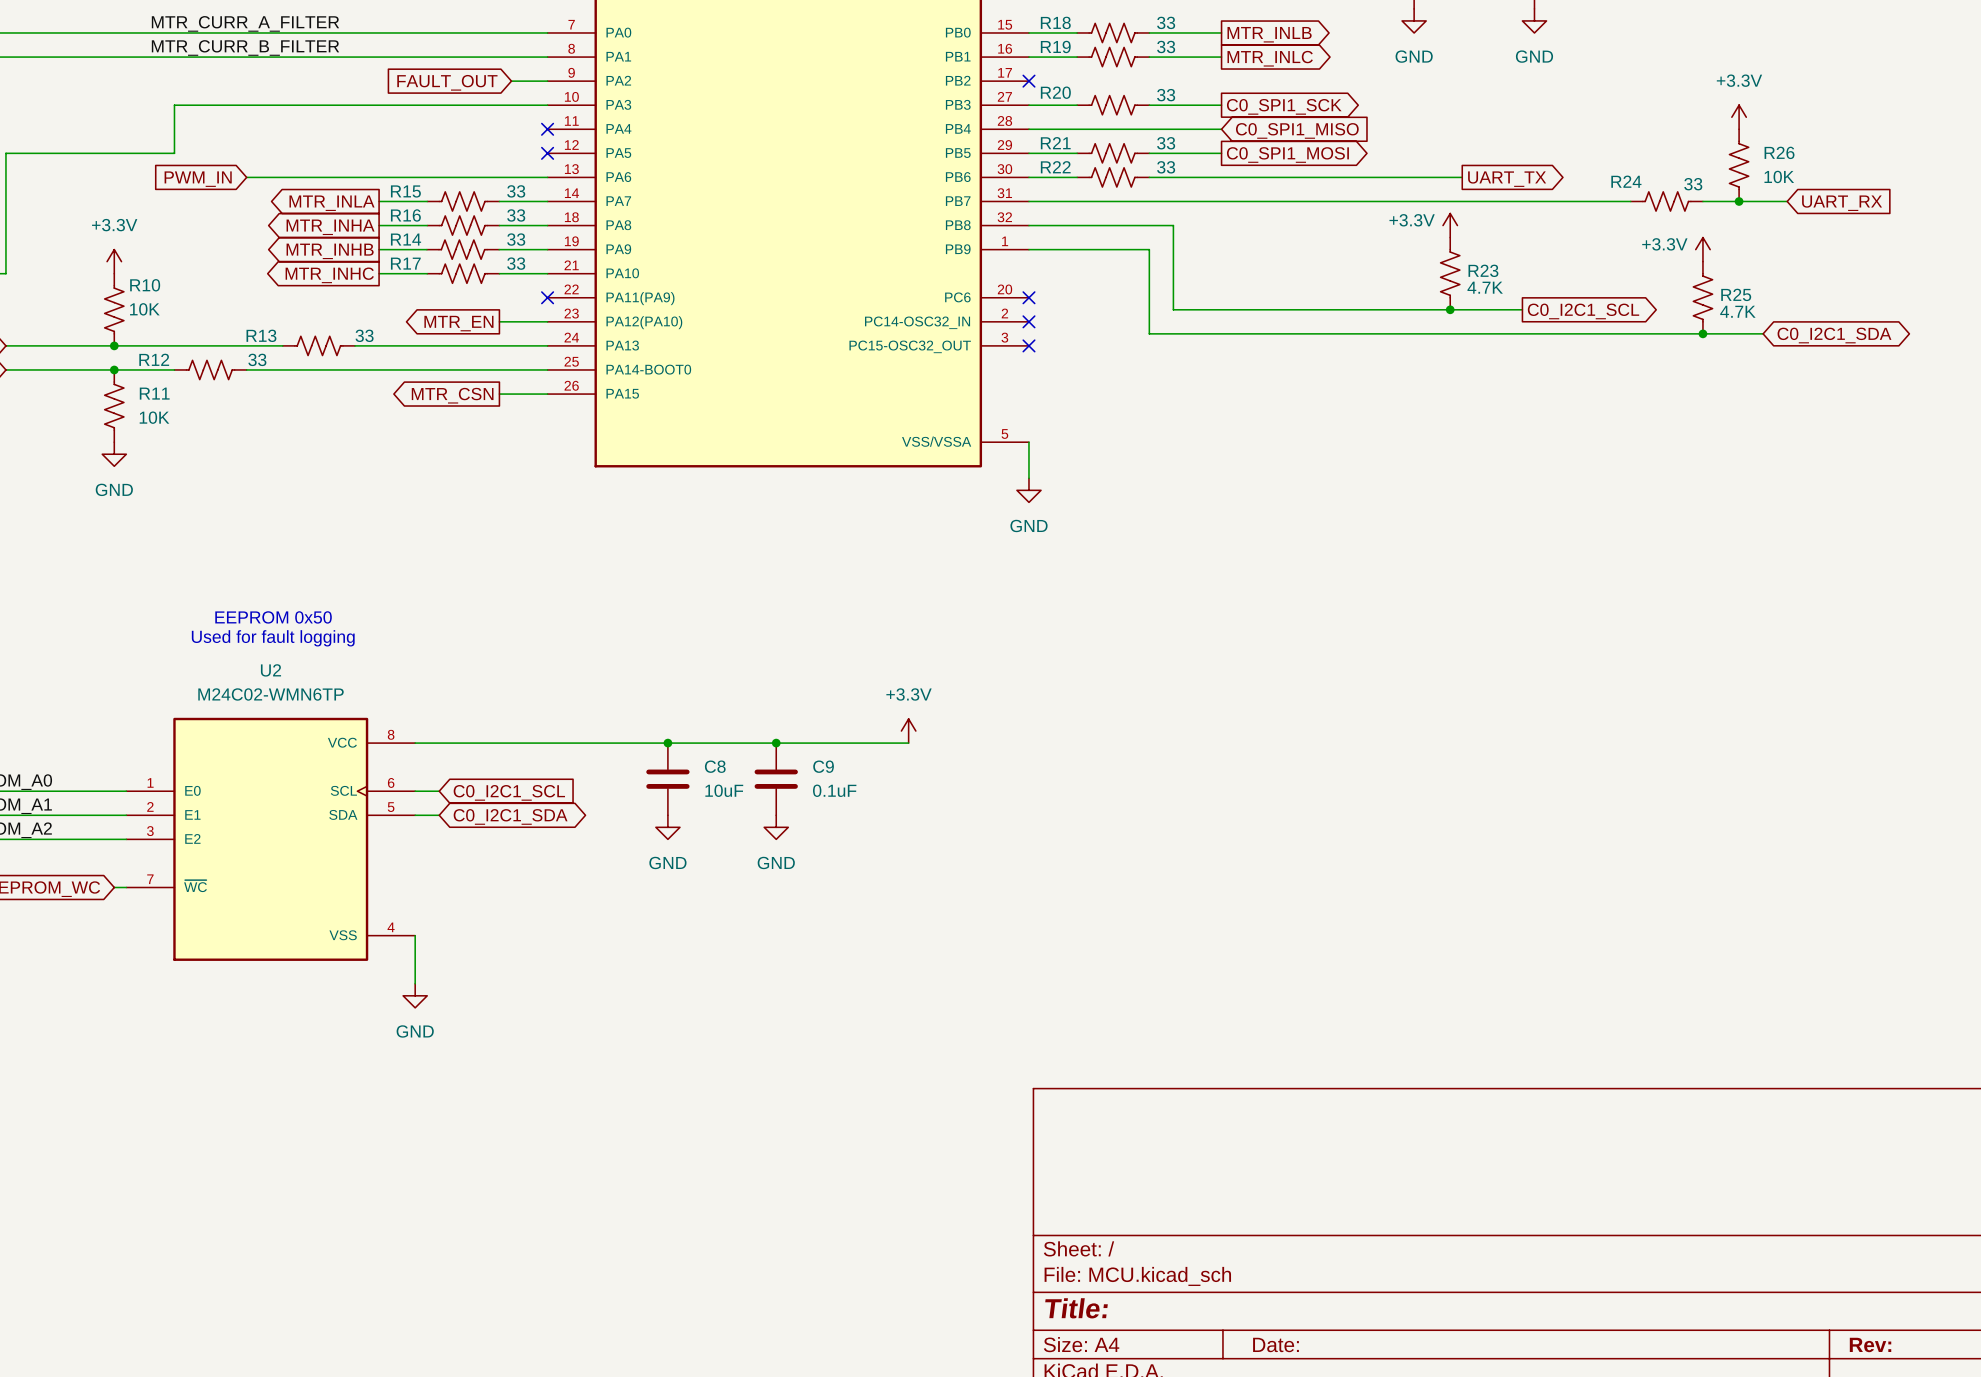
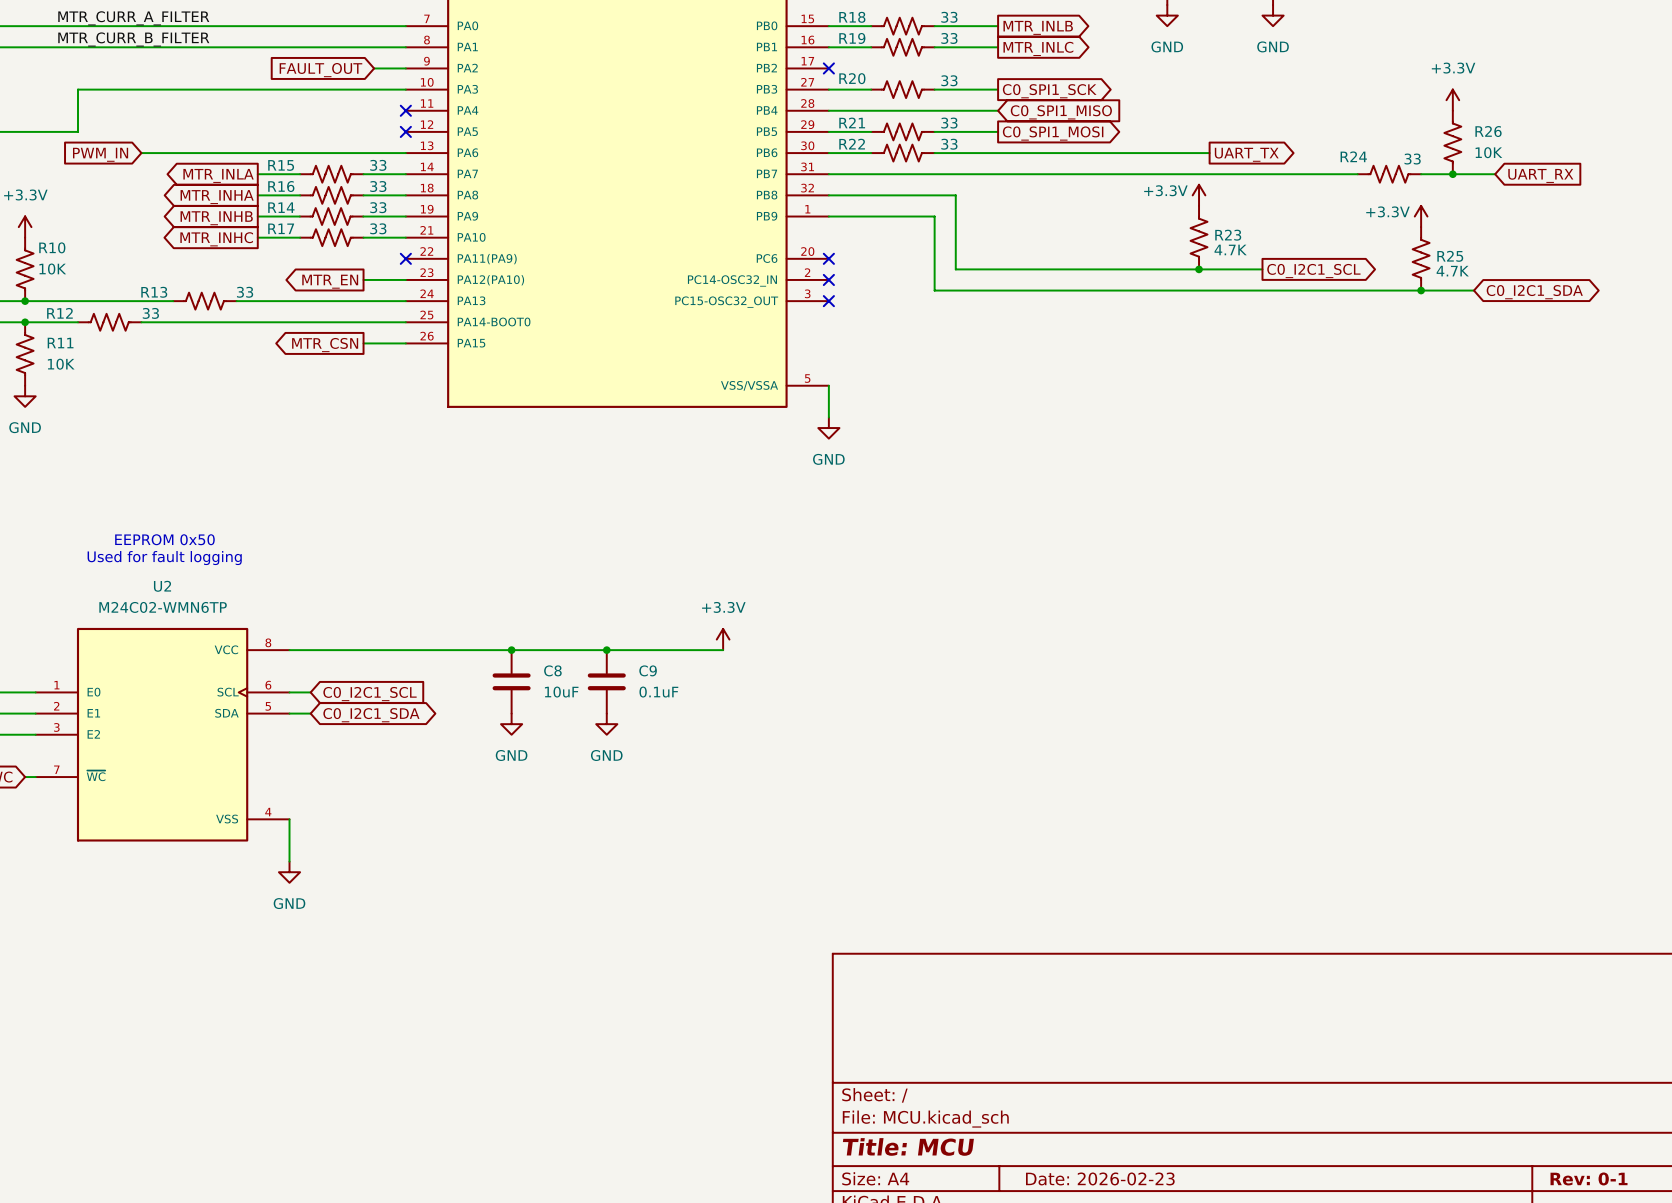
title block: Title: (1076, 1308) -> Title: MCU (908, 1146)
title block: Date: (1276, 1344) -> Date: 2026-02-23 (1100, 1178)
title block: Rev: (1870, 1344) -> Rev: 0-1 (1589, 1178)

